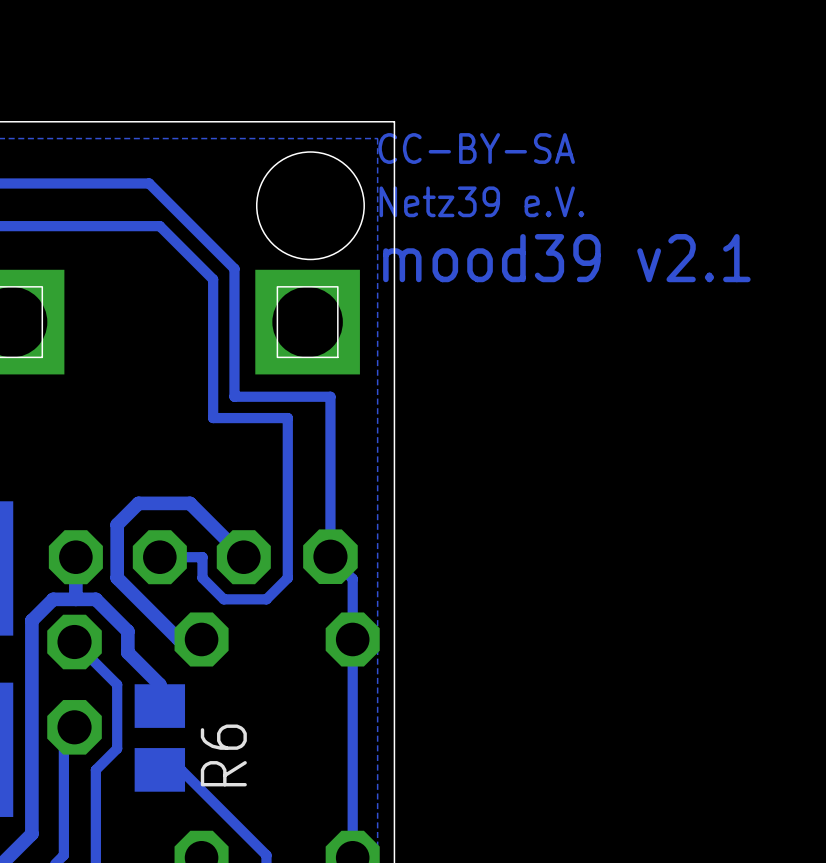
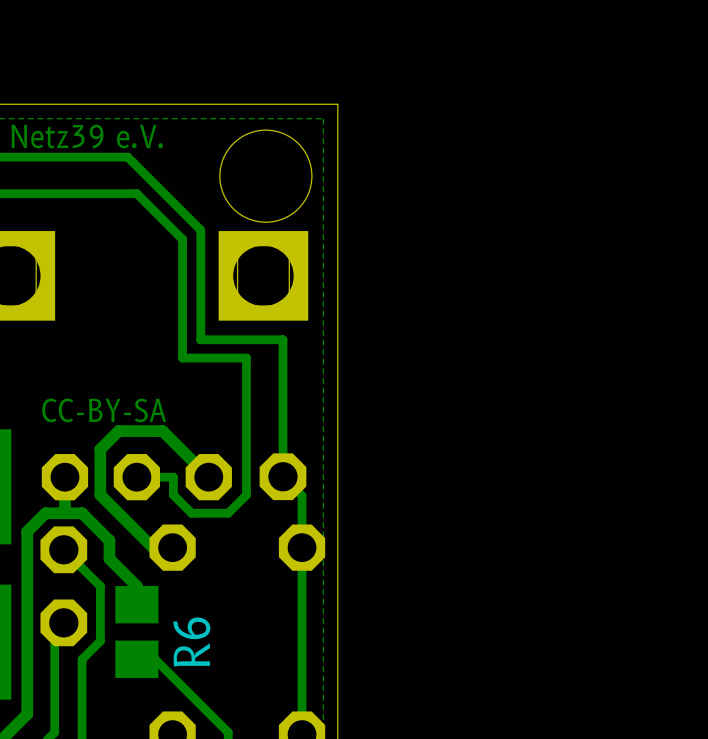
text position: CC-BY-SA (476, 148) -> CC-BY-SA (104, 410)
text position: Netz39 e.V. (481, 201) -> Netz39 e.V. (87, 136)
text: mood39 v2.1 (566, 258) -> none

